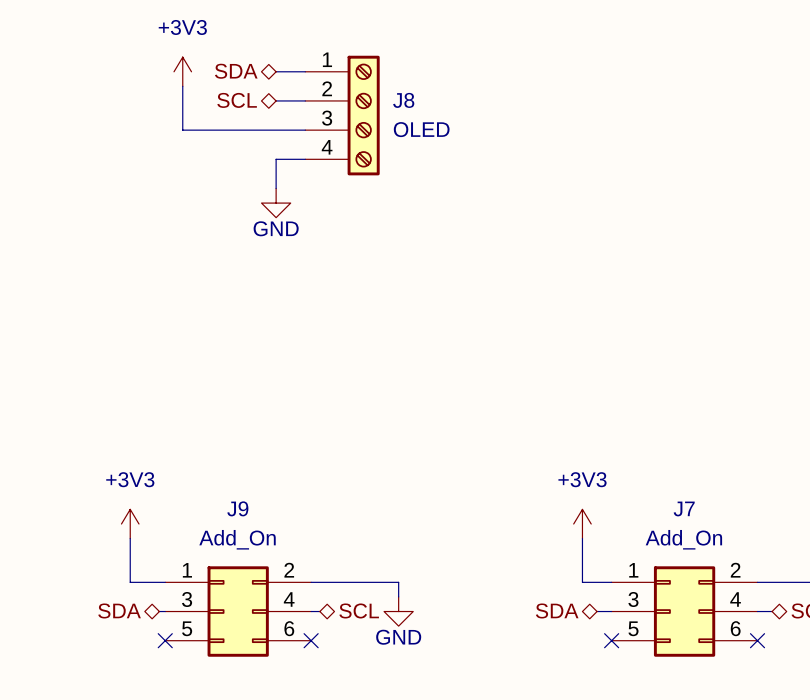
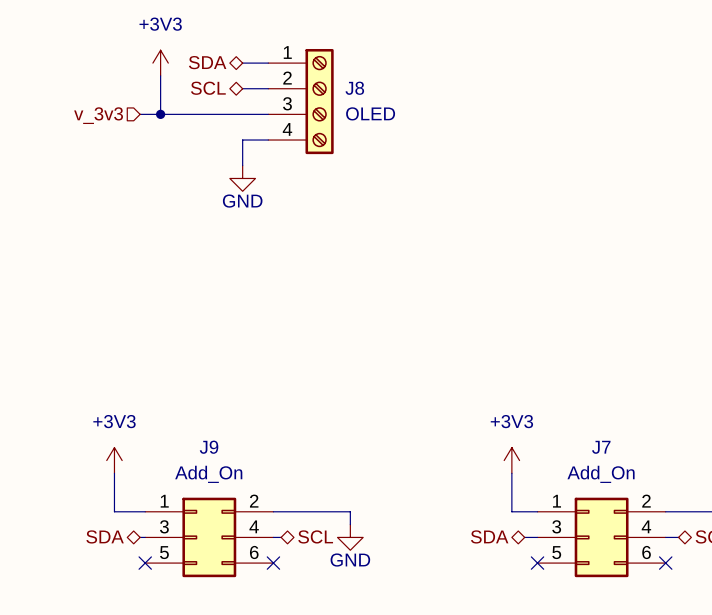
wire: none -> (140, 114) (160, 114)
junction: none -> (160, 114)
hierarchical label: none -> v_3v3 (98, 115)

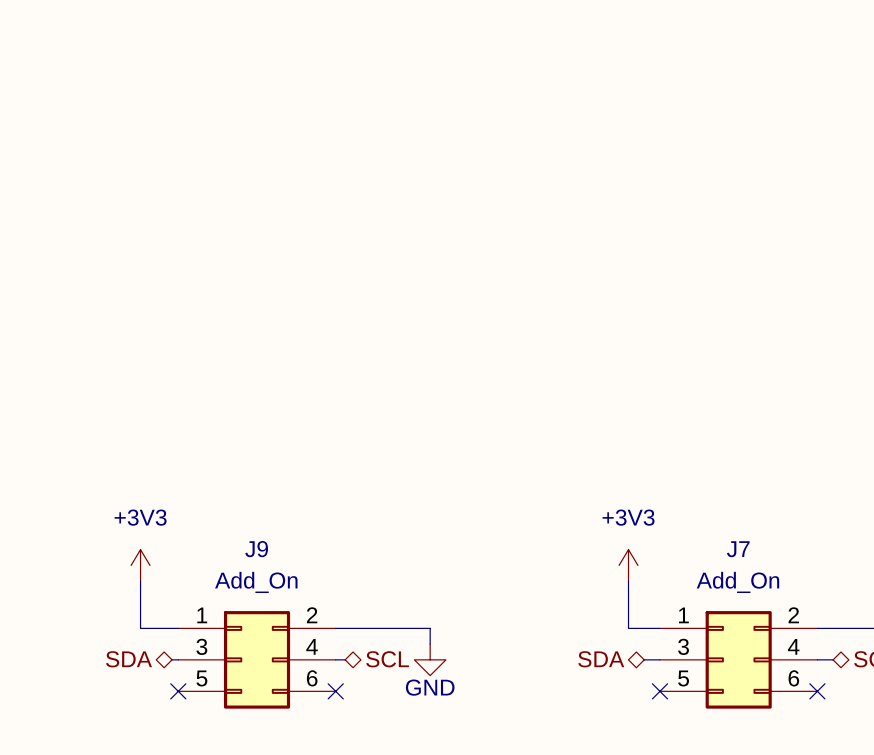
hierarchical label: SDA (207, 62) -> none
power symbol: +3V3 (160, 63) -> none
wire: (242, 63) (268, 63) -> none
wire: (160, 75) (160, 114) -> none
hierarchical label: SCL (208, 88) -> none
wire: (242, 88) (268, 88) -> none
J8: OLED (300, 101) -> none
wire: (140, 114) (268, 114) -> none
junction: (160, 114) -> none
hierarchical label: v_3v3 (98, 115) -> none
wire: (268, 140) (242, 140) (242, 165) -> none
power symbol: GND (242, 178) -> none

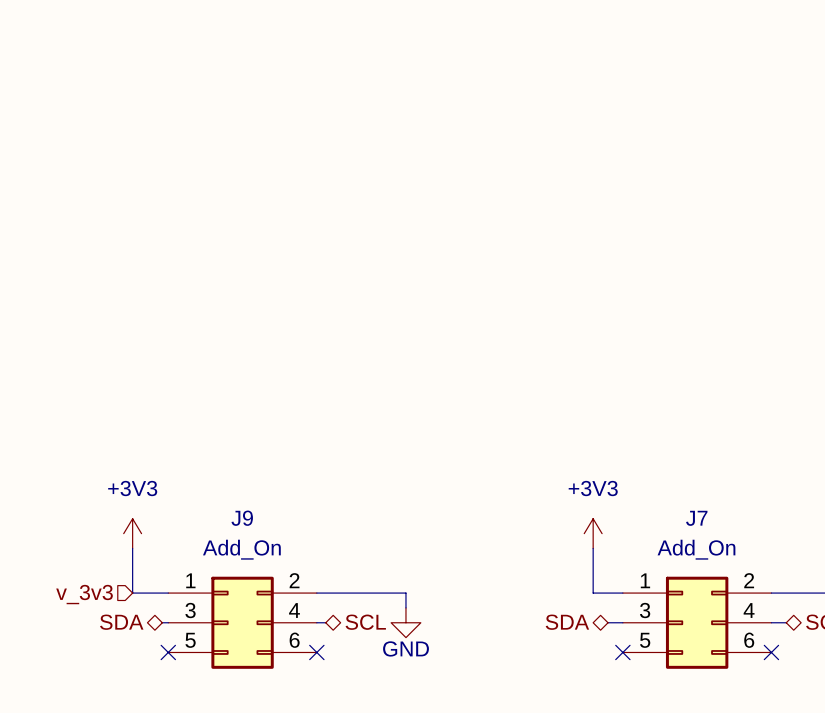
hierarchical label: none -> v_3v3 (84, 594)

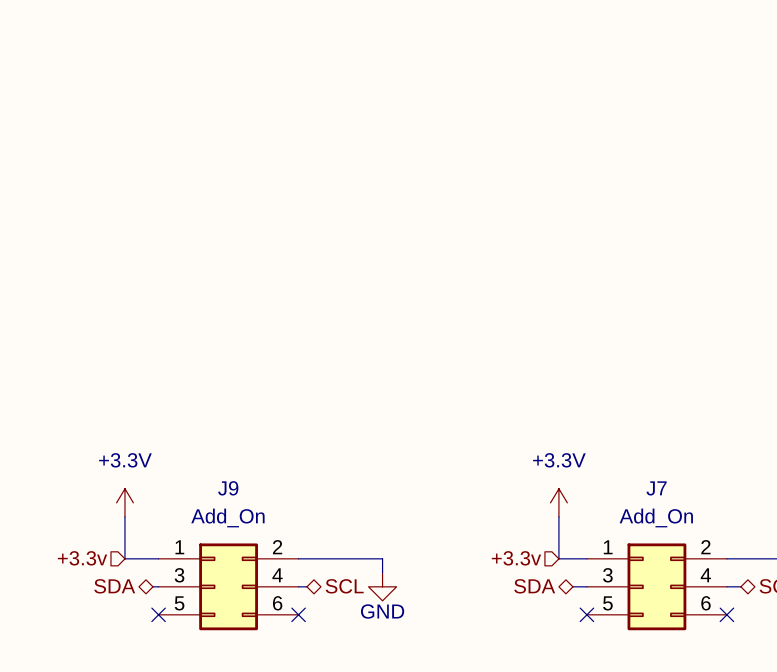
power symbol: +3V3 (132, 533) -> +3.3V (124, 502)
power symbol: +3V3 (593, 533) -> +3.3V (558, 502)
hierarchical label: none -> +3.3v (516, 558)
hierarchical label: v_3v3 (84, 594) -> +3.3v (82, 558)

